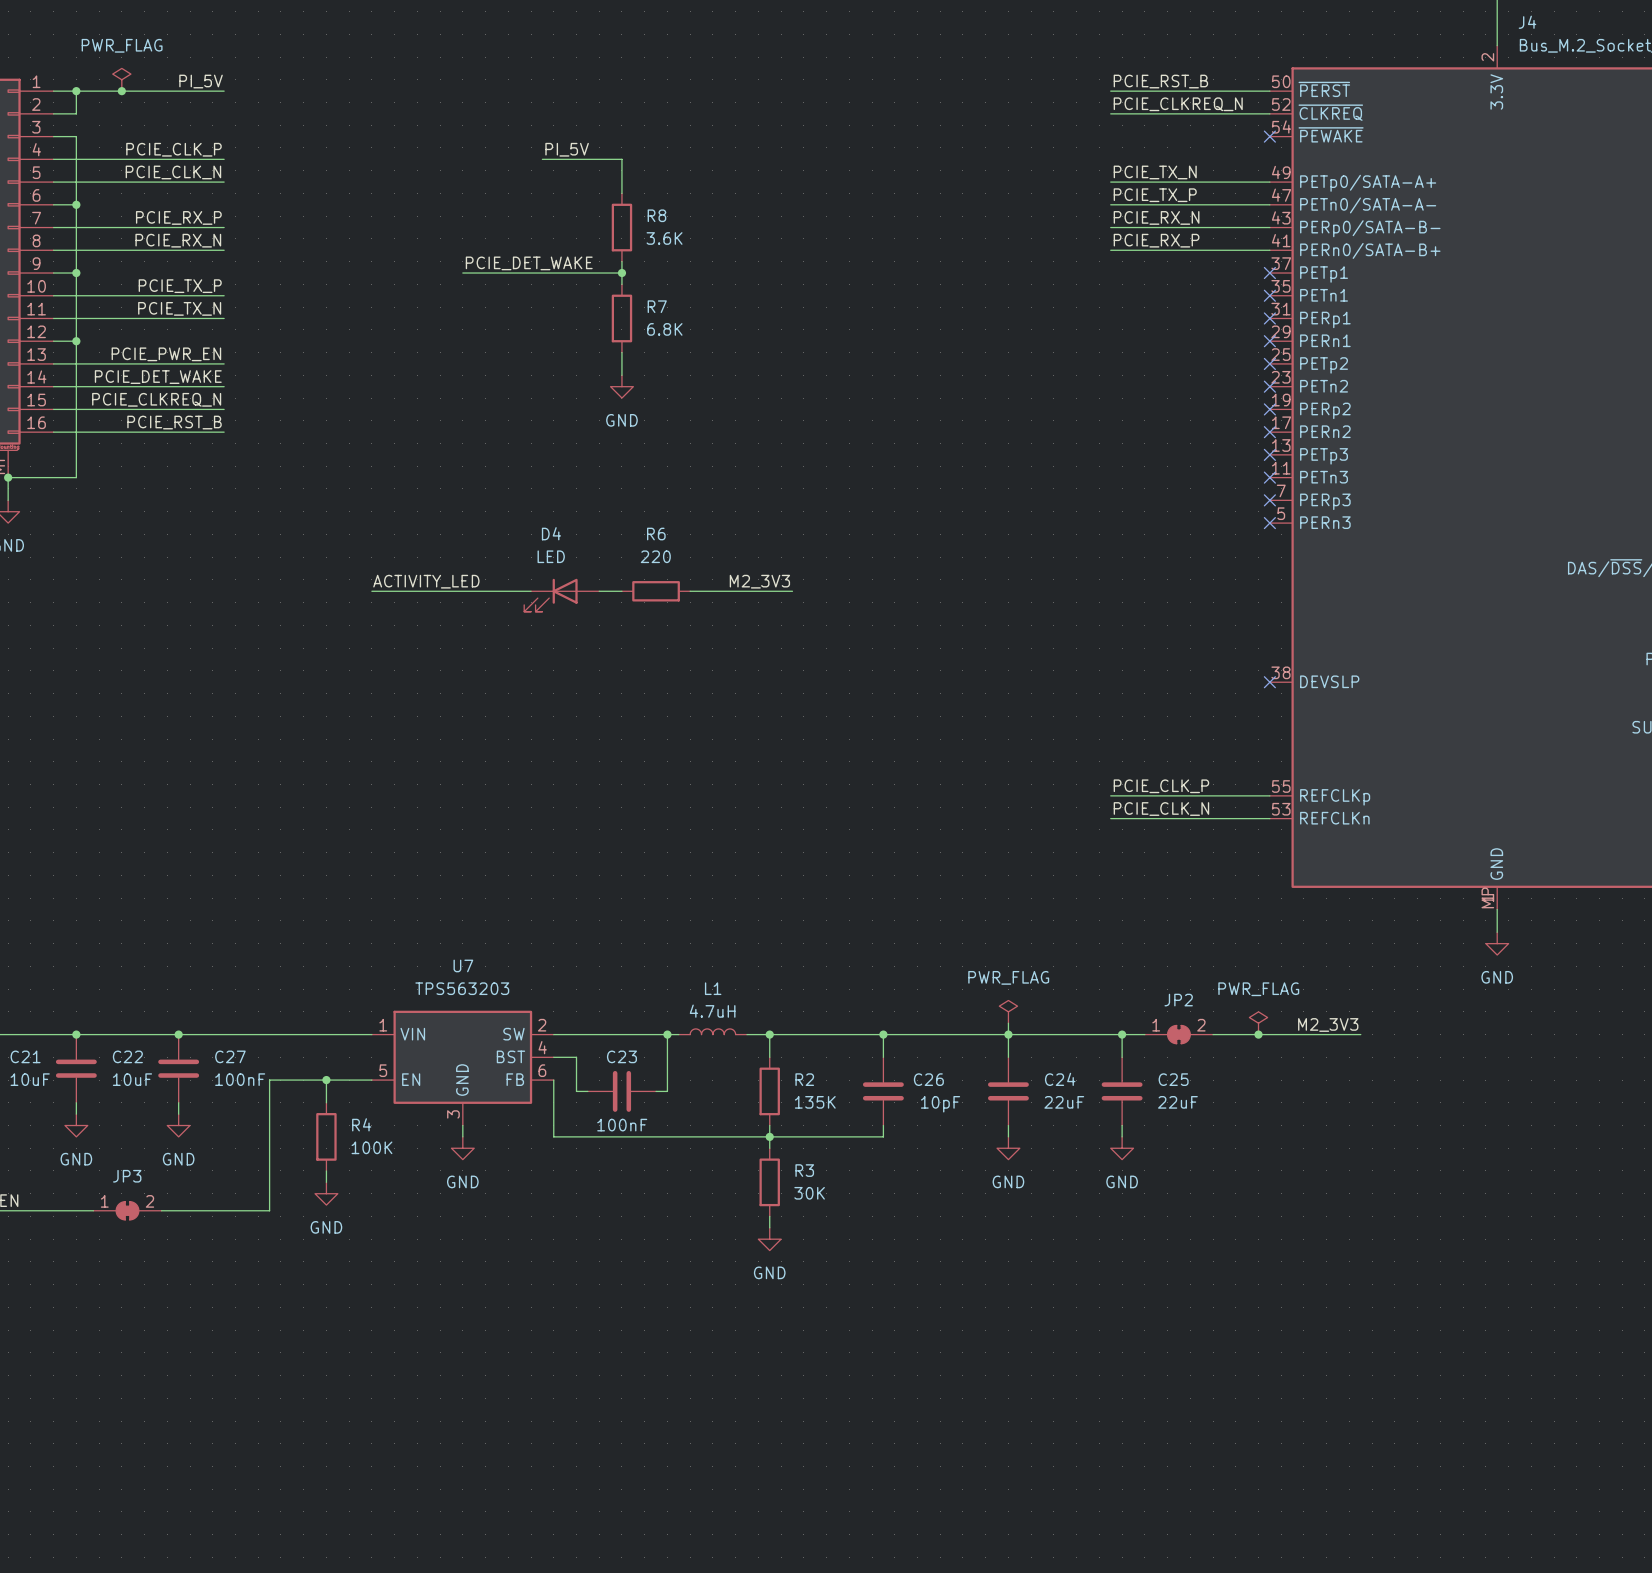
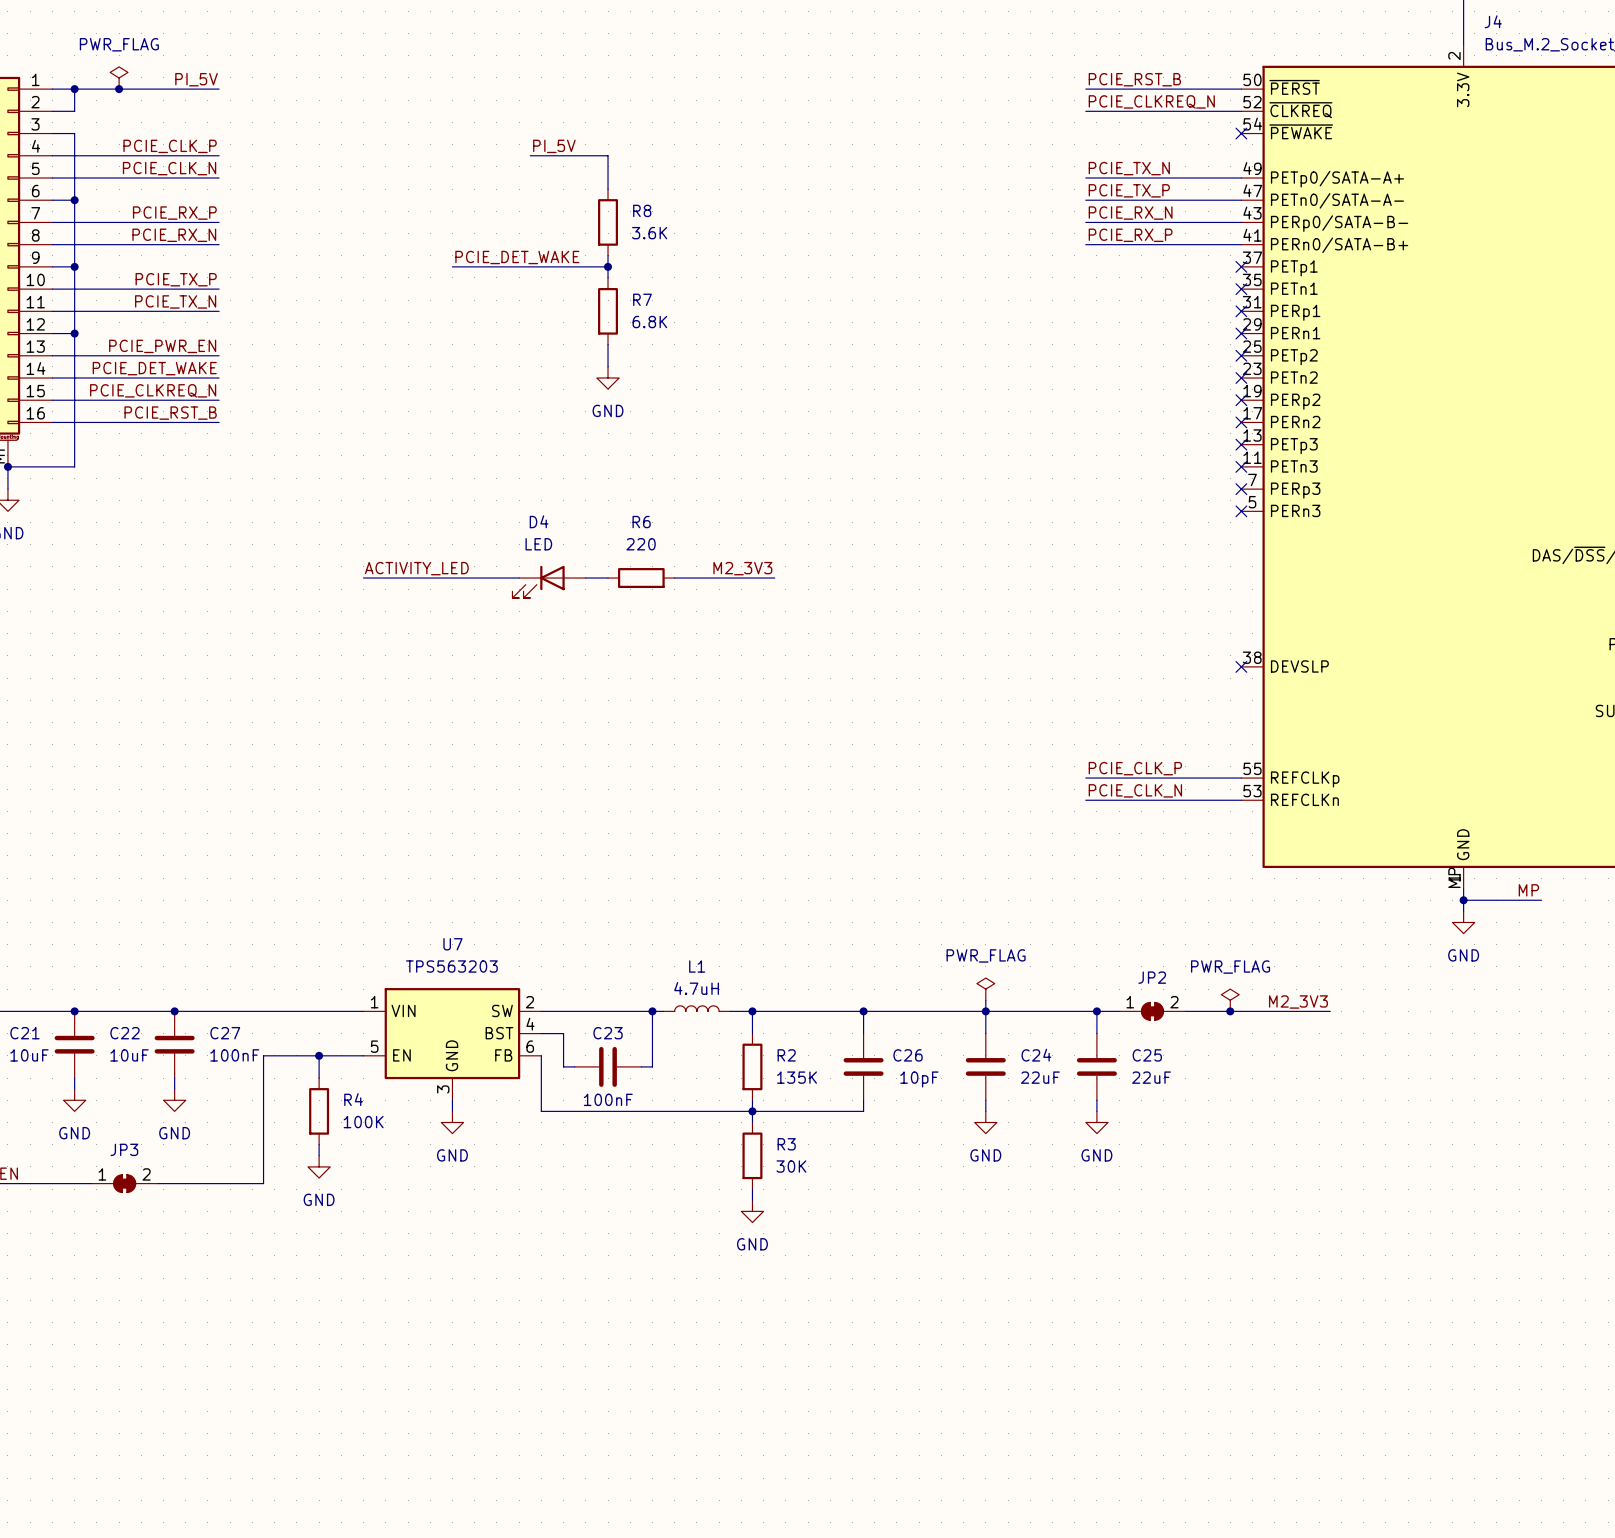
label: none -> MP (1528, 890)
wire: none -> (1463, 900) (1541, 900)
junction: none -> (1463, 900)

